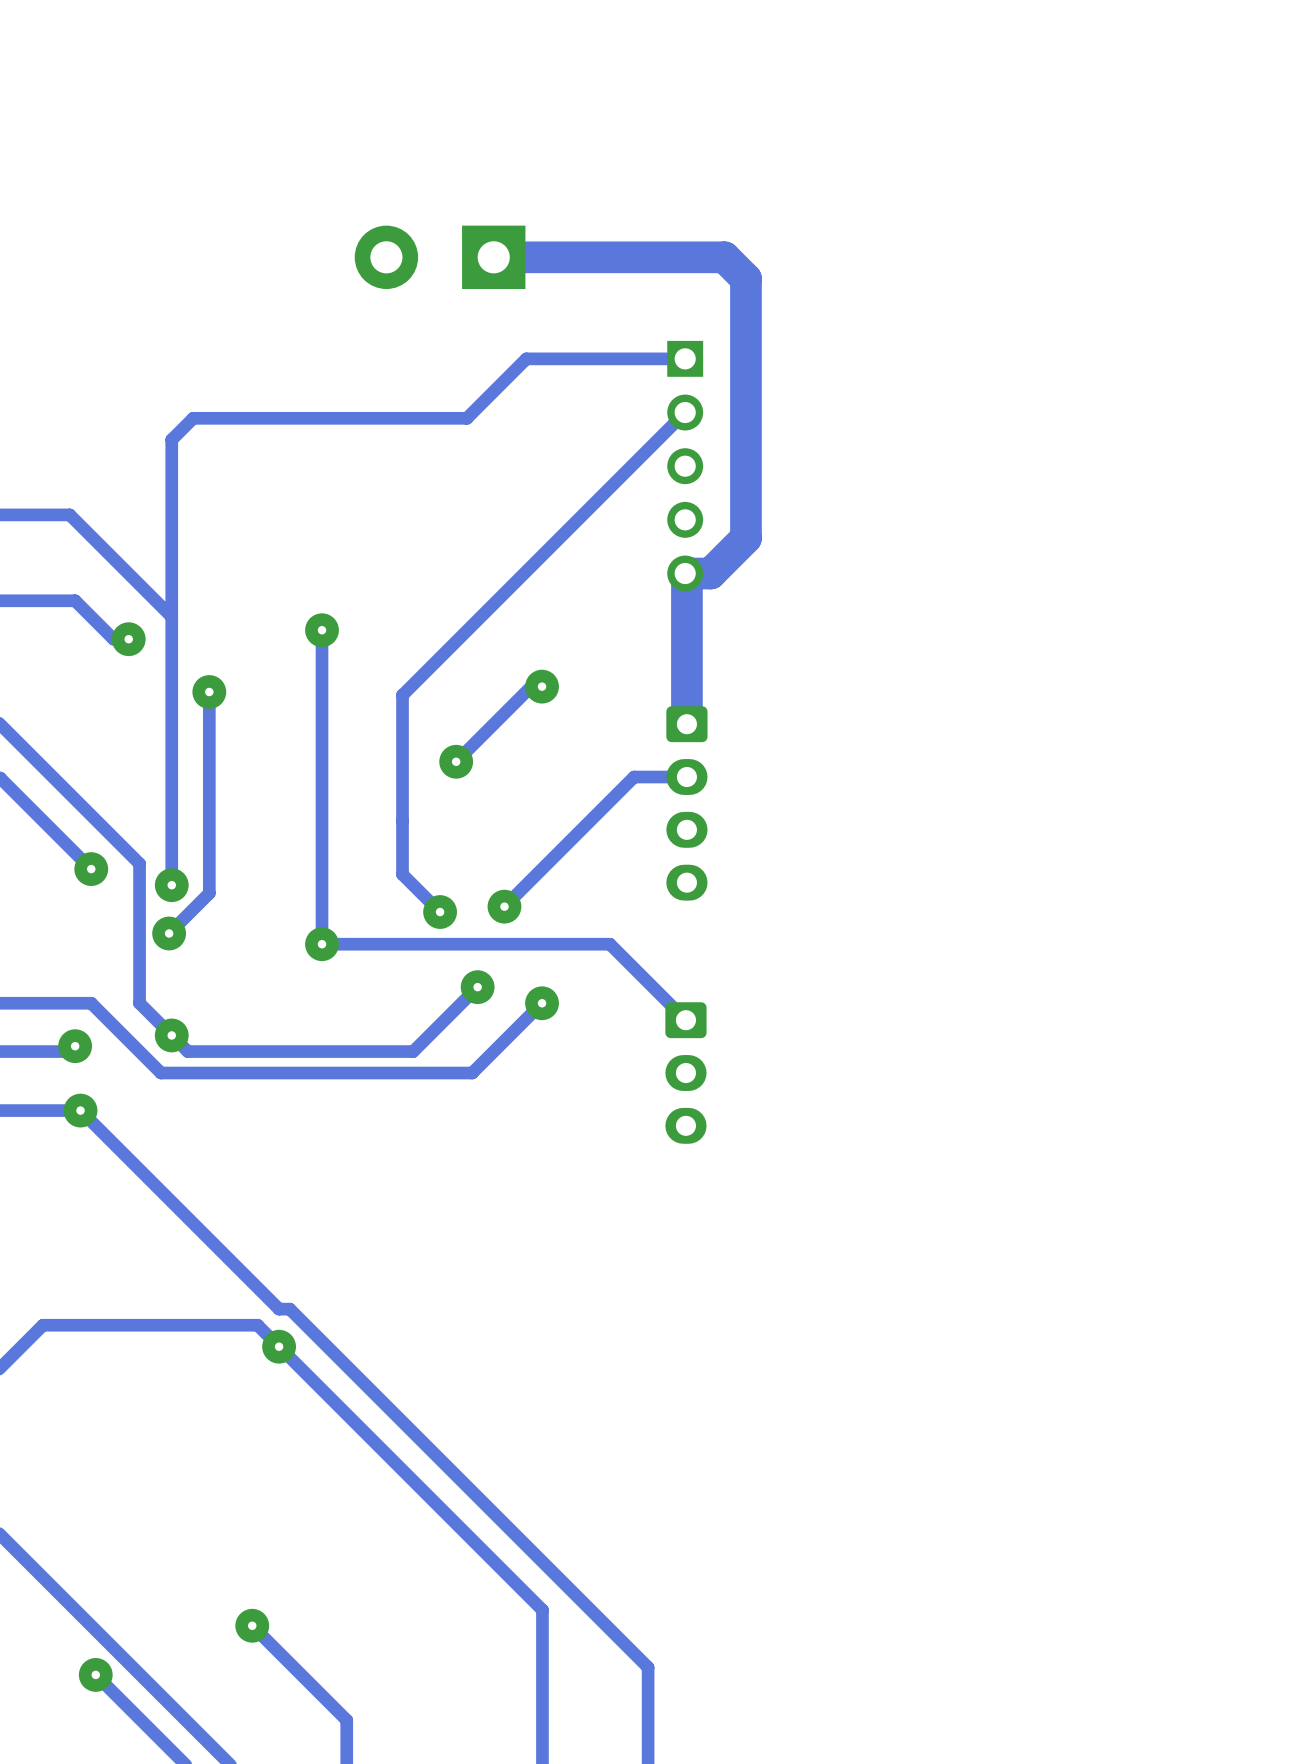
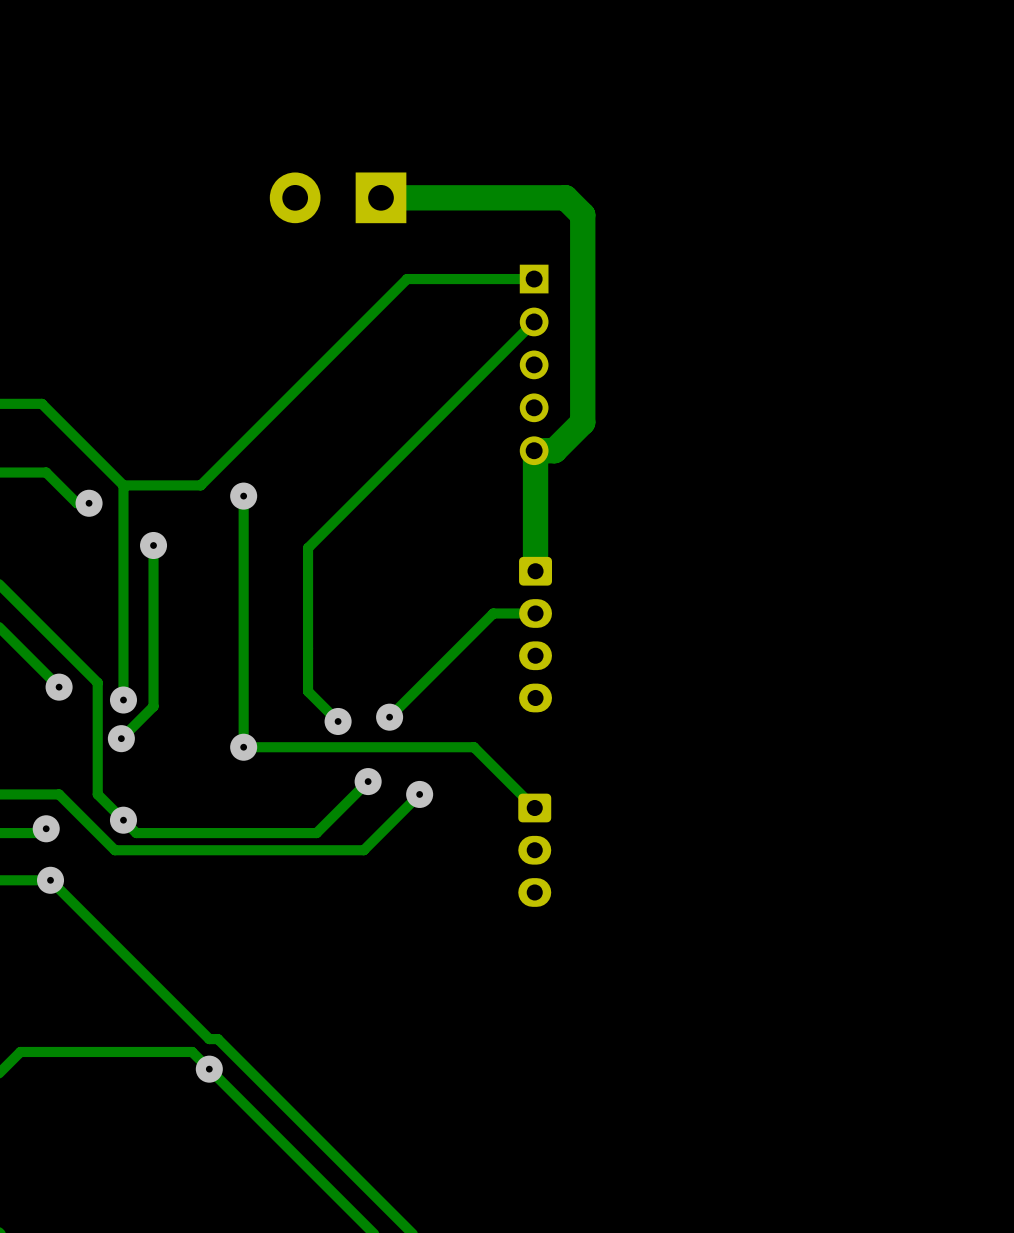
track: (466, 418) (193, 418) (171, 439) (171, 616) -> (359, 326) (200, 485) (123, 485)
track: (542, 686) (531, 686) (456, 761) -> none
via: (542, 686) -> none
via: (456, 761) -> none

